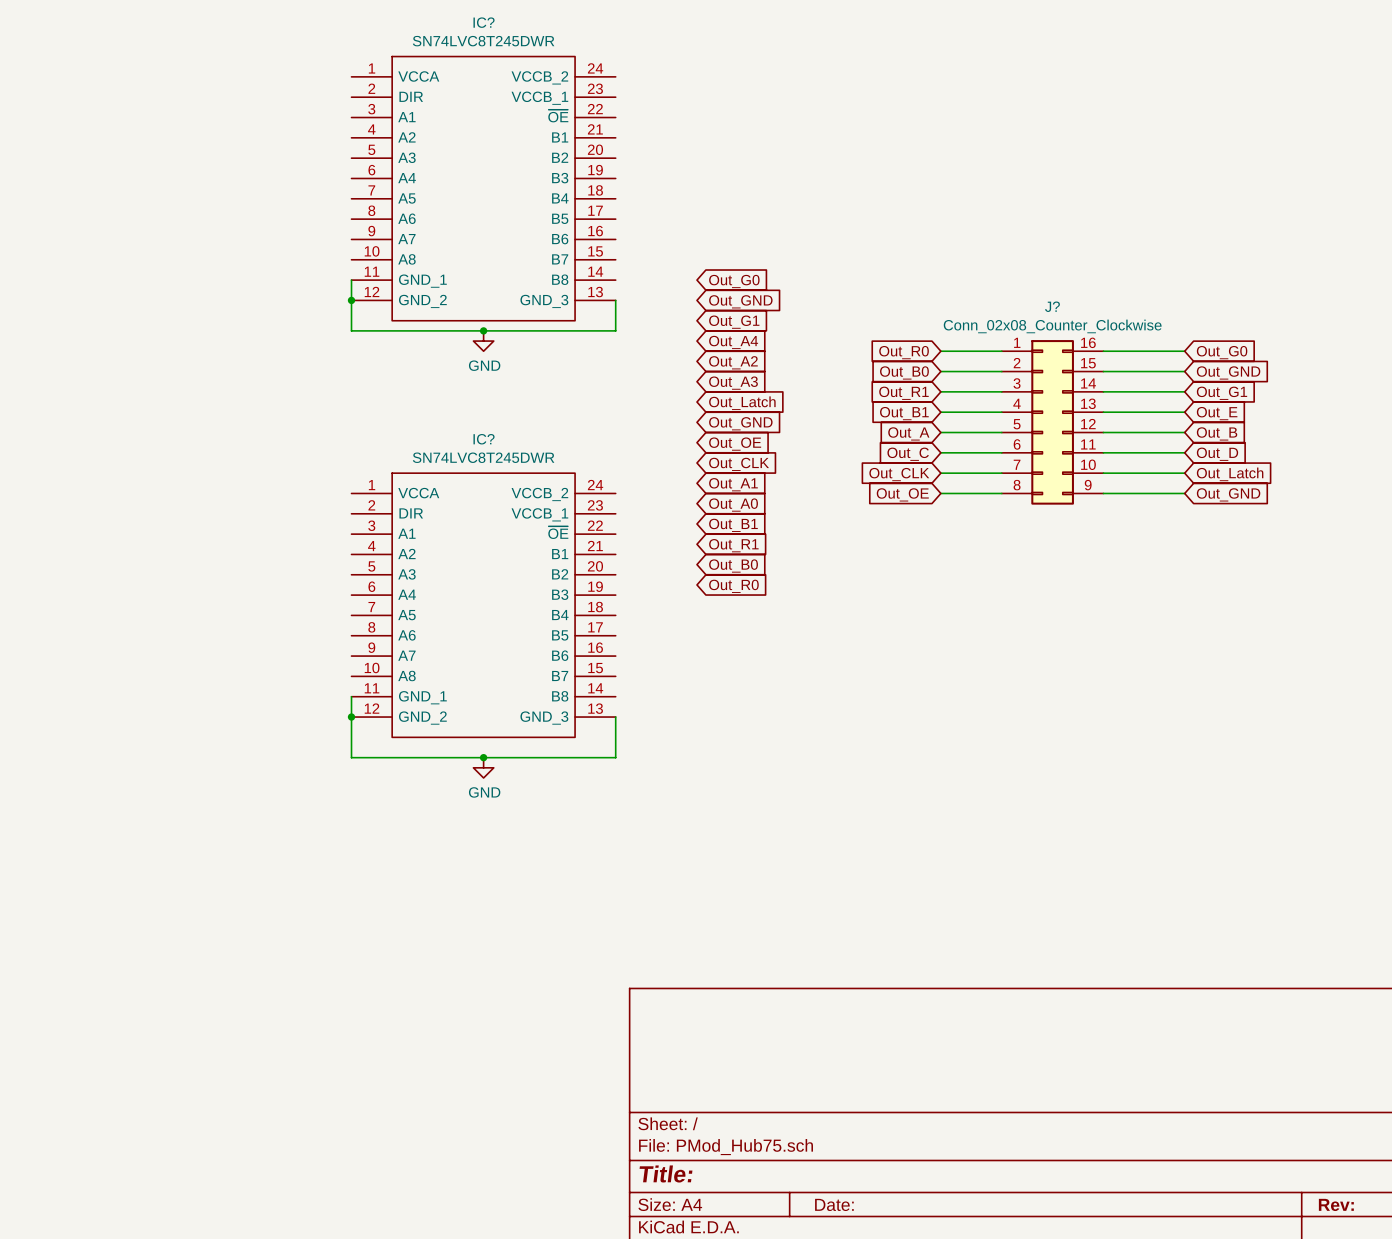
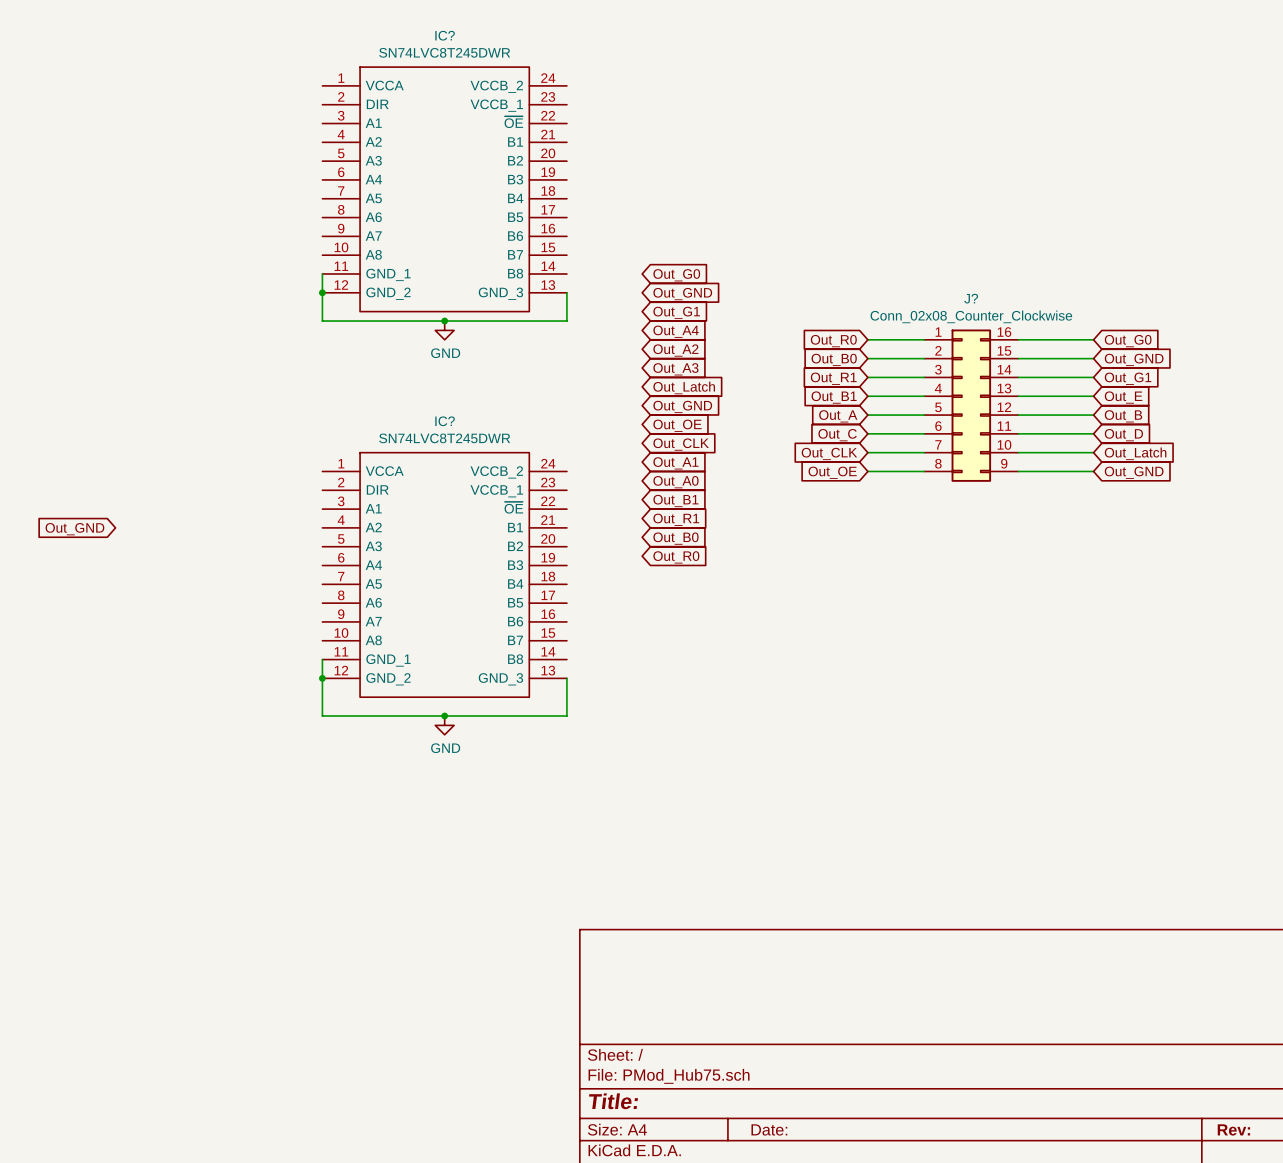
global label: none -> Out_GND (74, 529)

